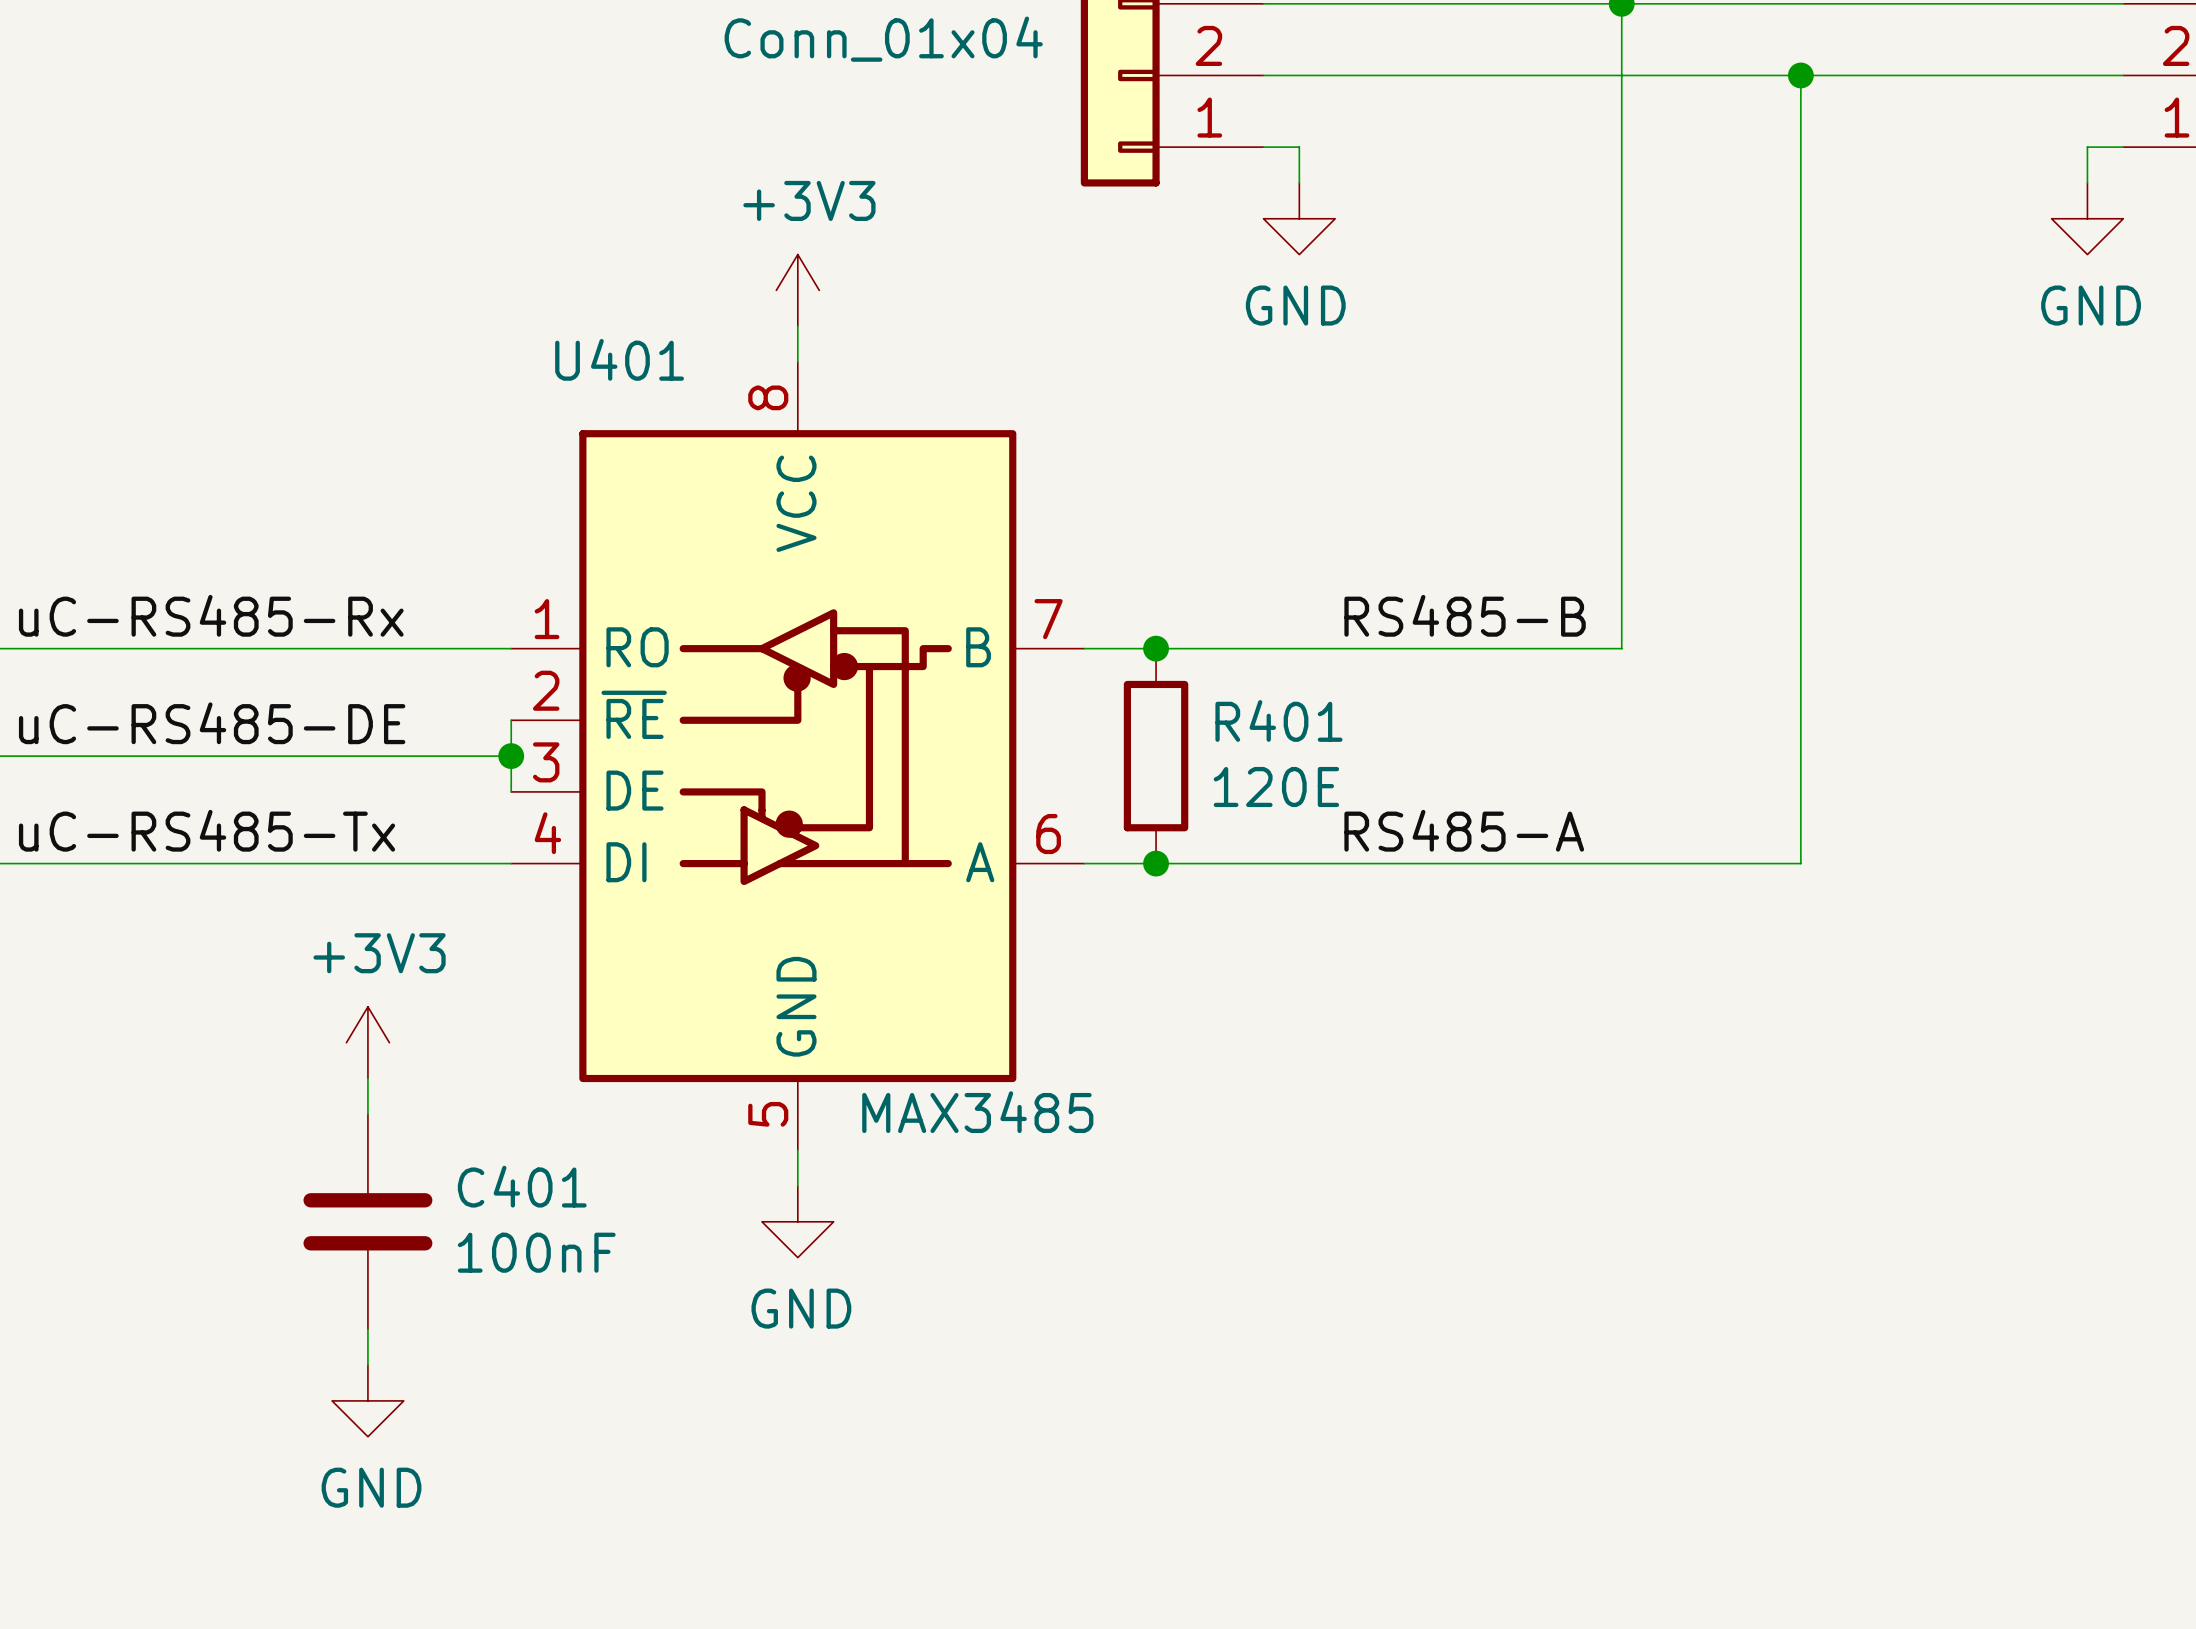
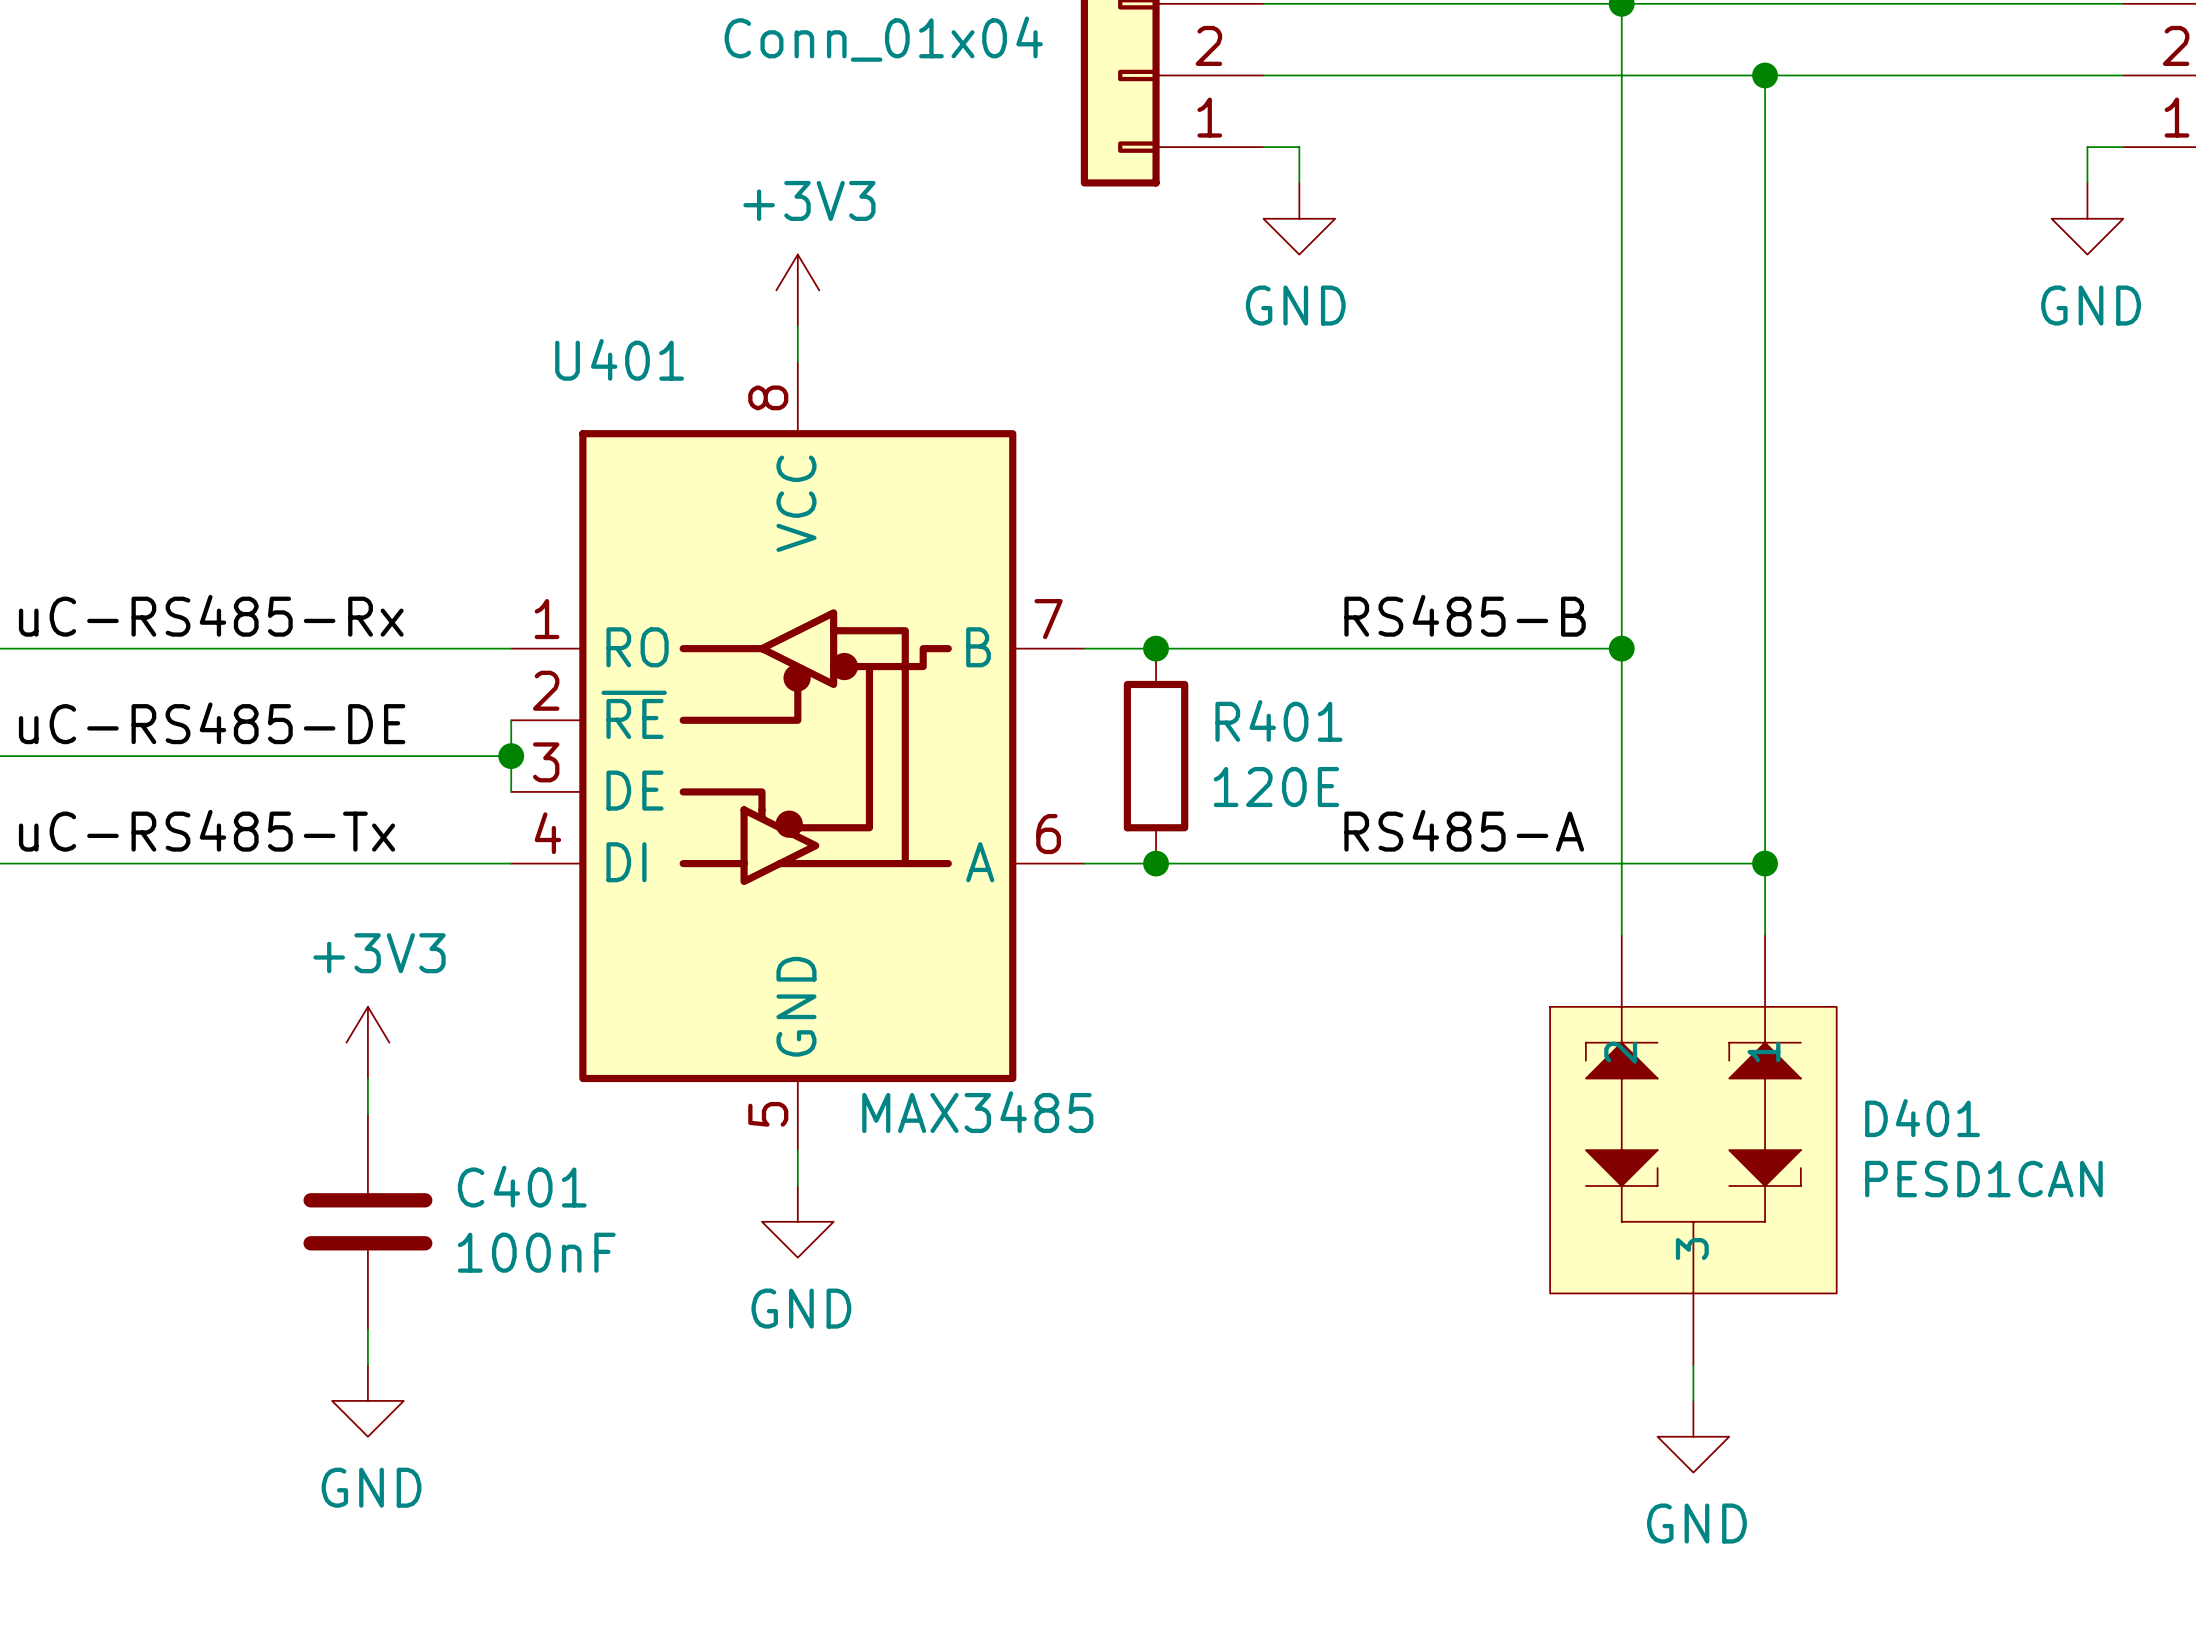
wire: none -> (1765, 75) (1765, 935)
wire: (1800, 75) (1800, 863) (1765, 863) -> none
junction position: (1800, 75) -> (1765, 75)
wire: none -> (1621, 648) (1621, 935)
junction: none -> (1621, 648)
junction: none -> (1765, 863)
D401: none -> PESD1CAN (1693, 1150)
wire: none -> (1693, 1365) (1693, 1400)
power symbol: none -> GND (1693, 1436)

